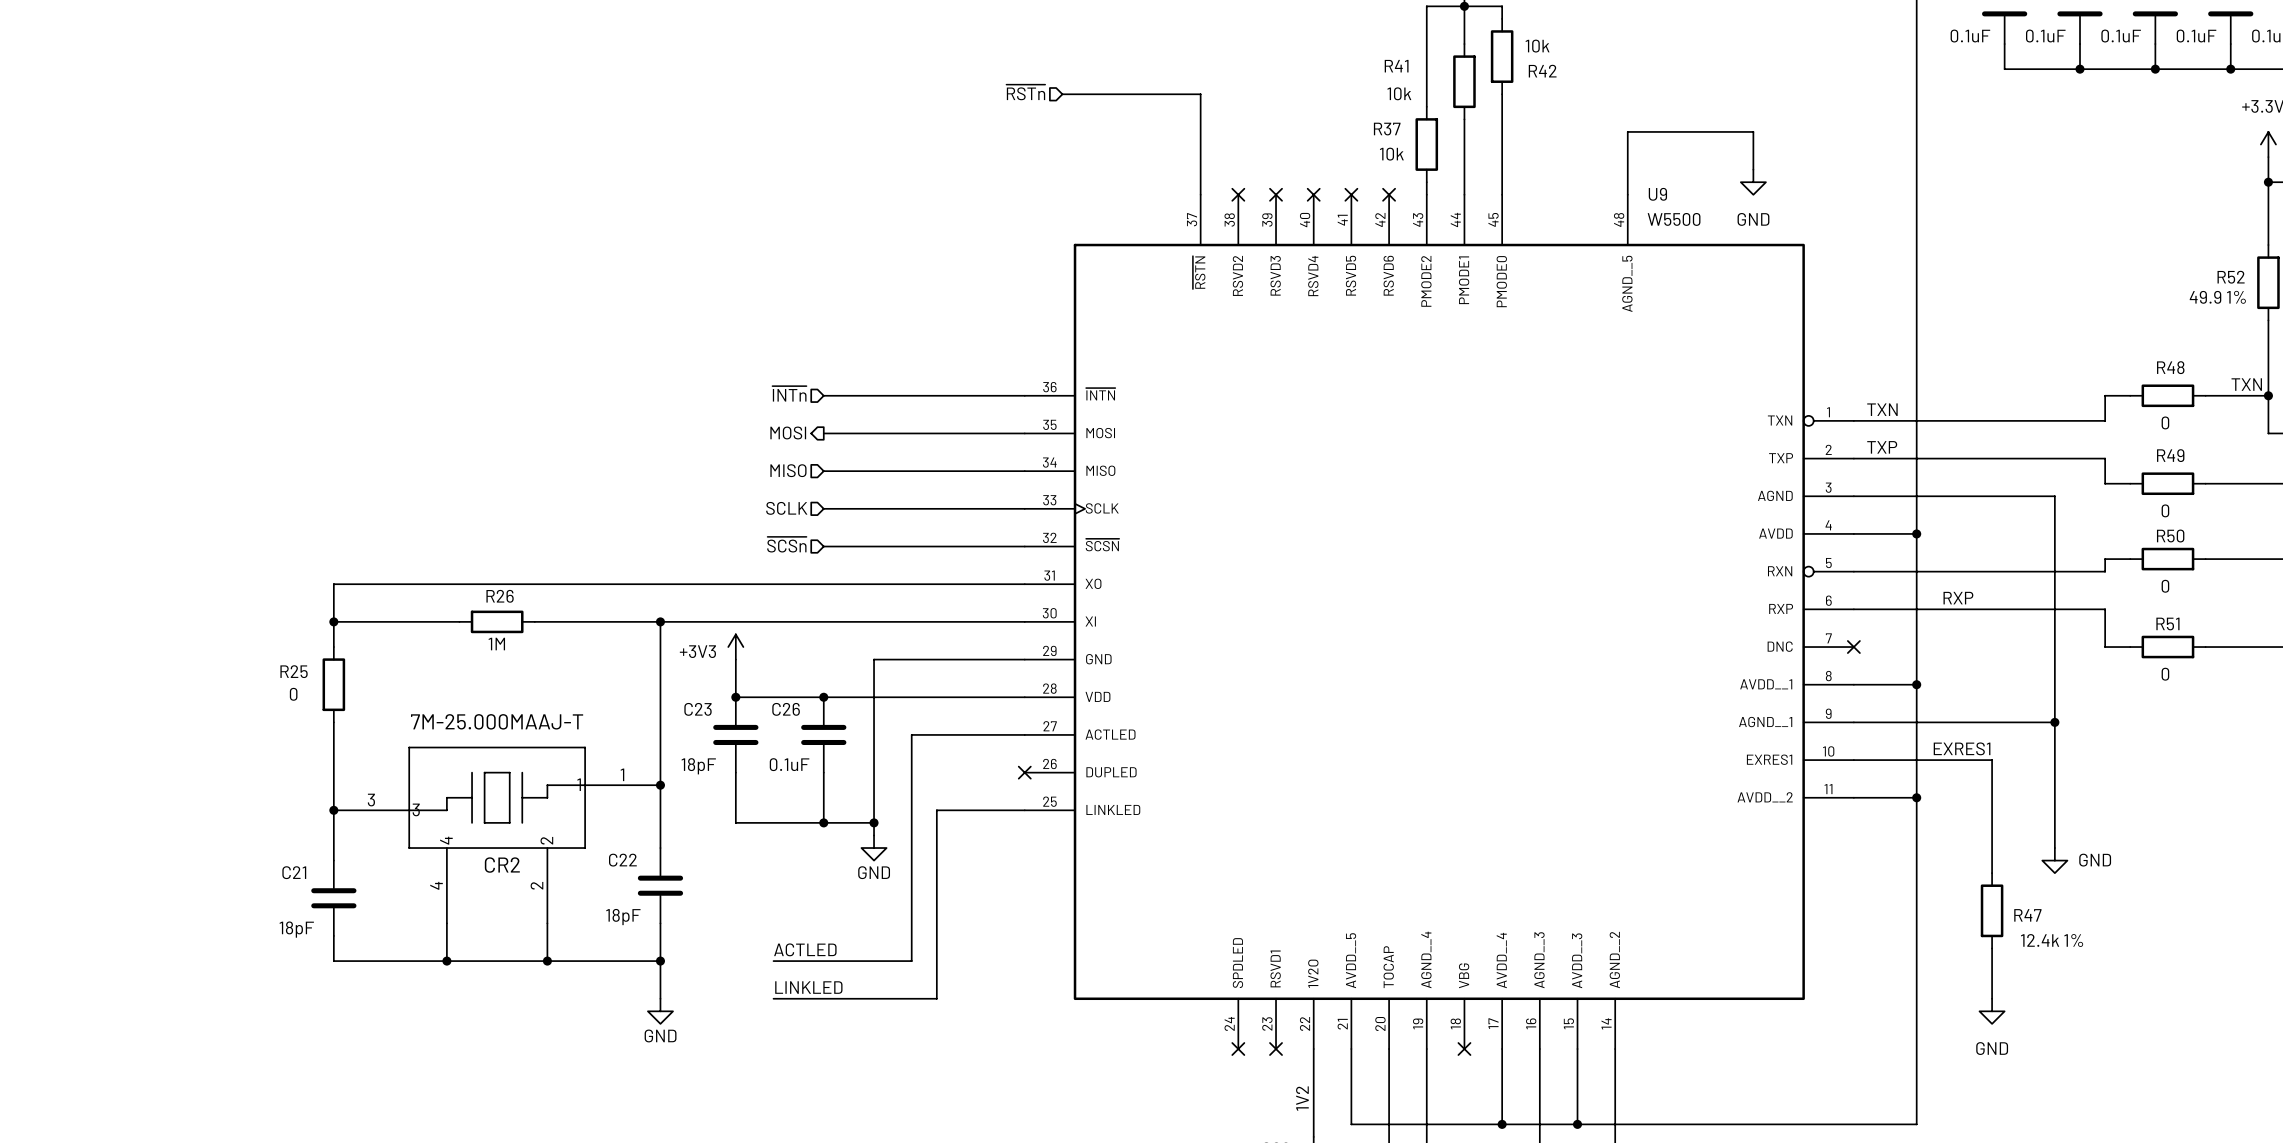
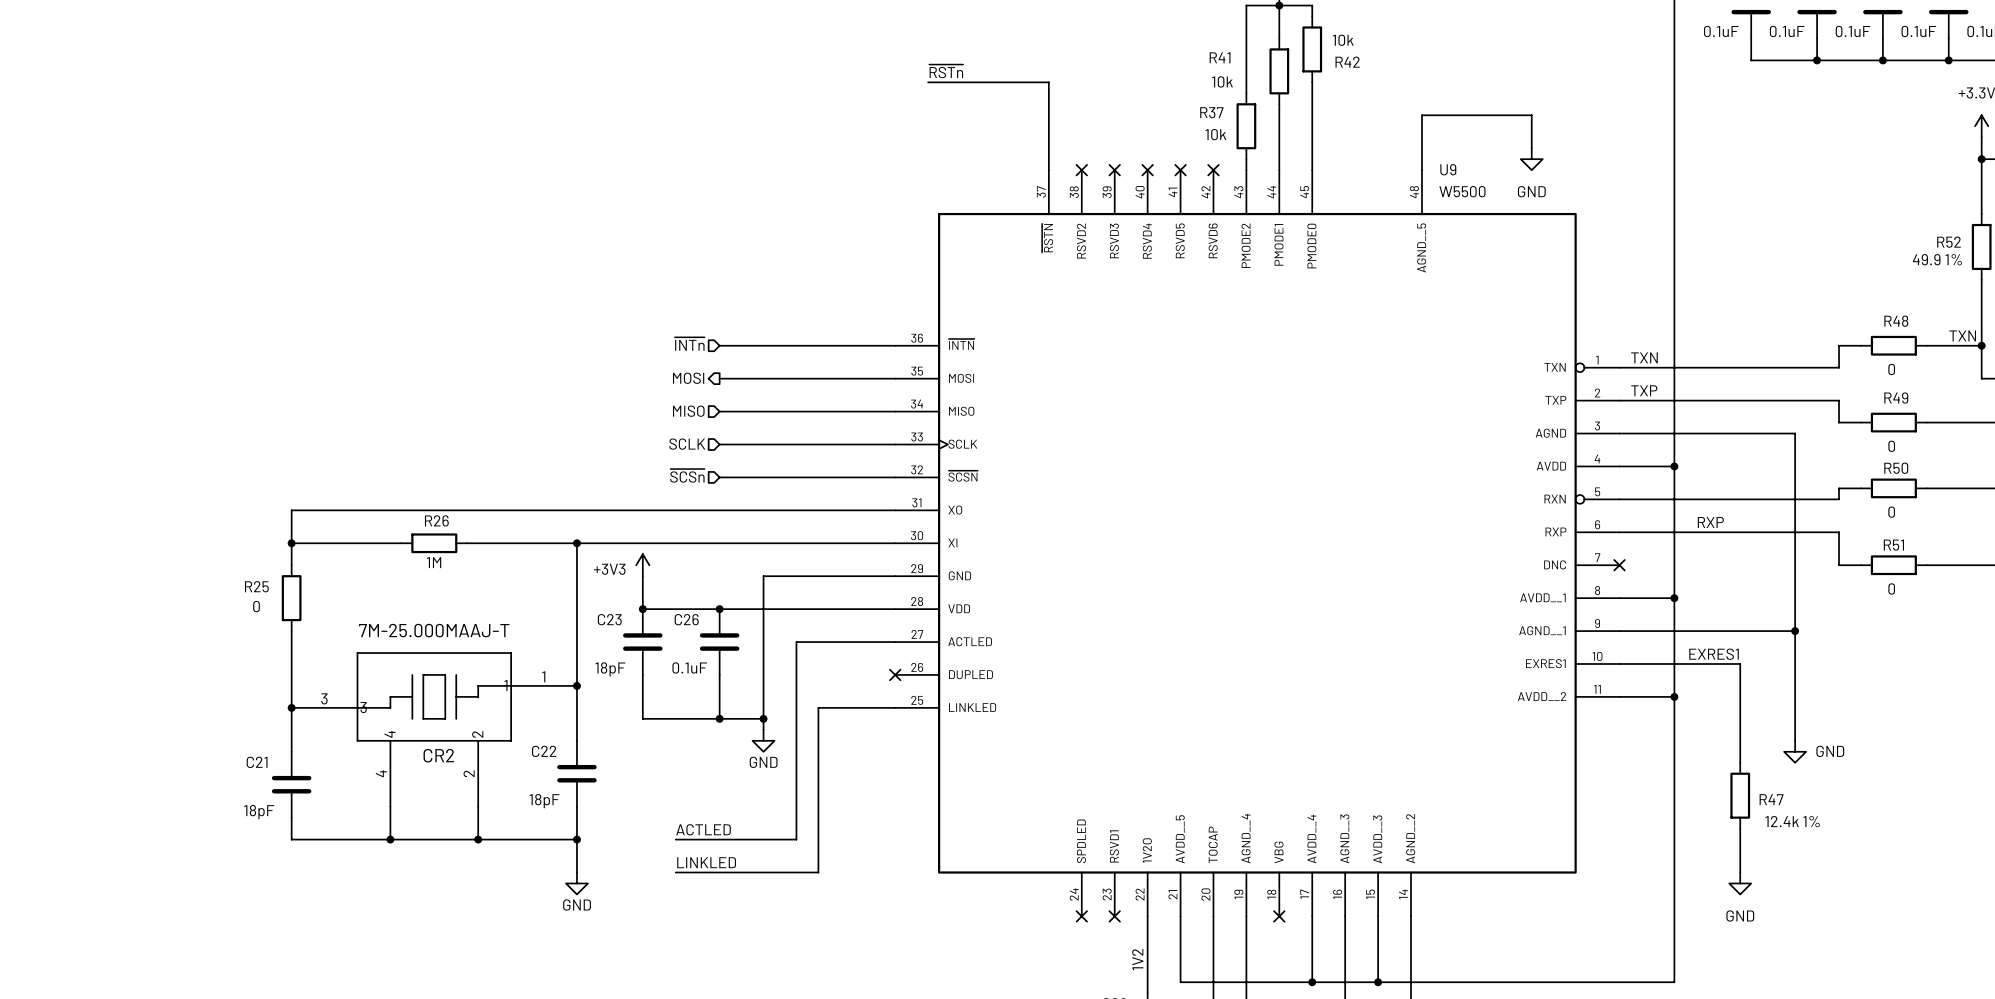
label: none -> ~{RSTn} (946, 71)
hierarchical label: ~{RSTn} (1025, 92) -> none

